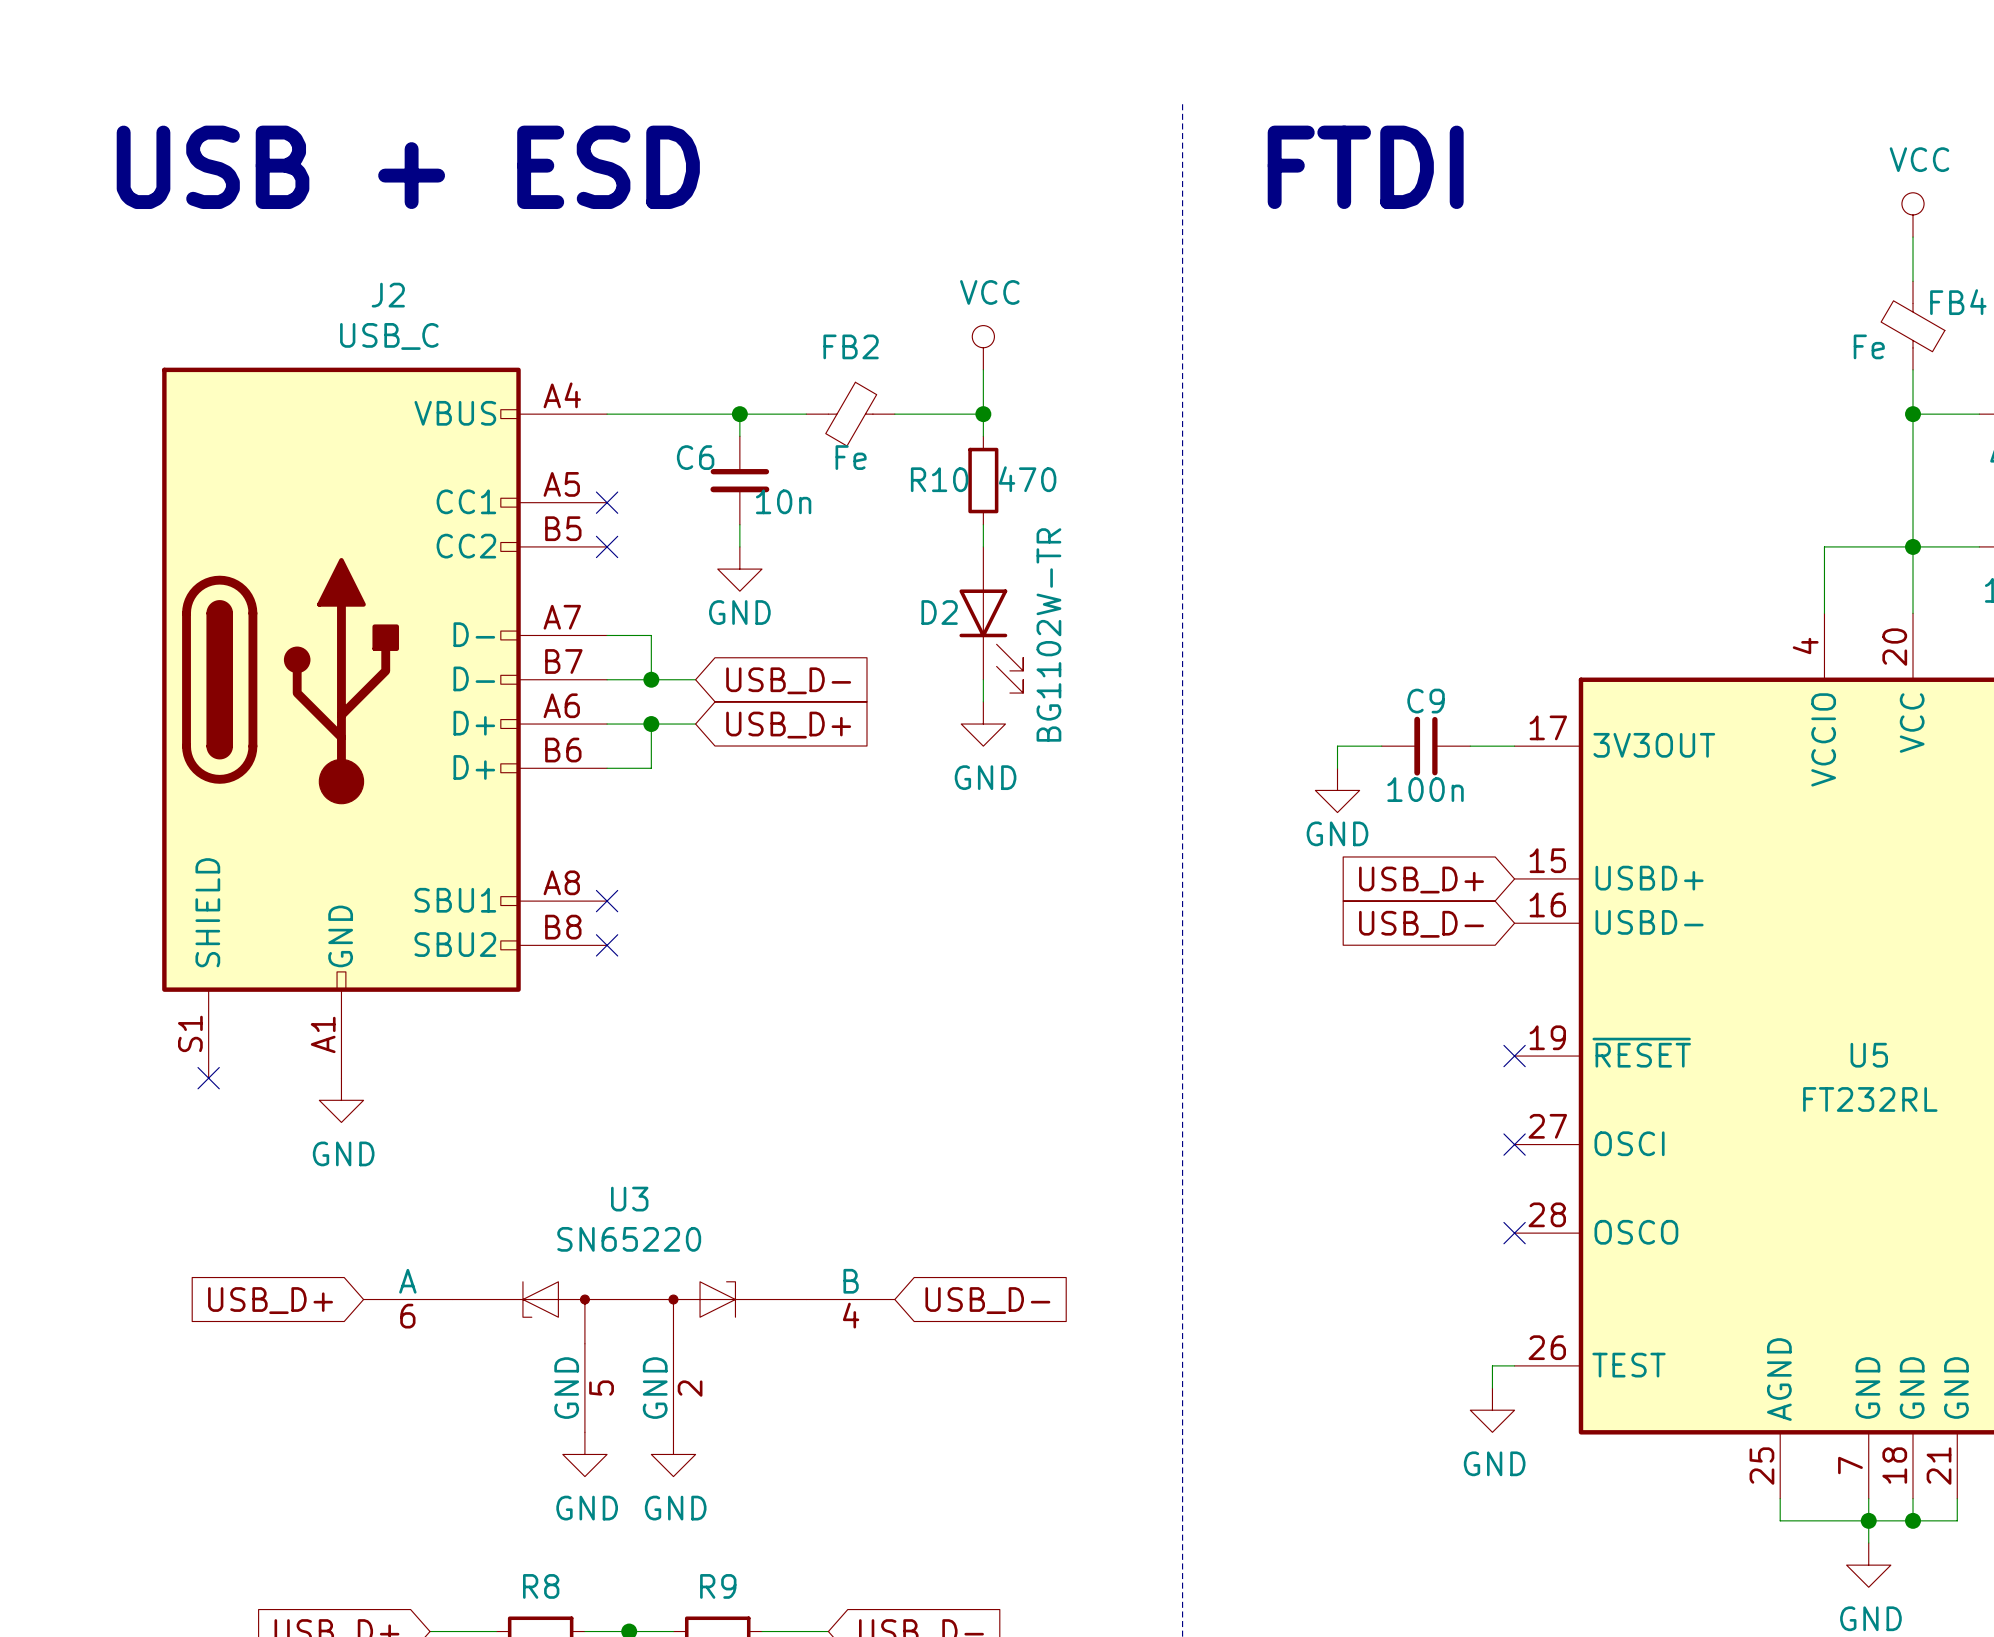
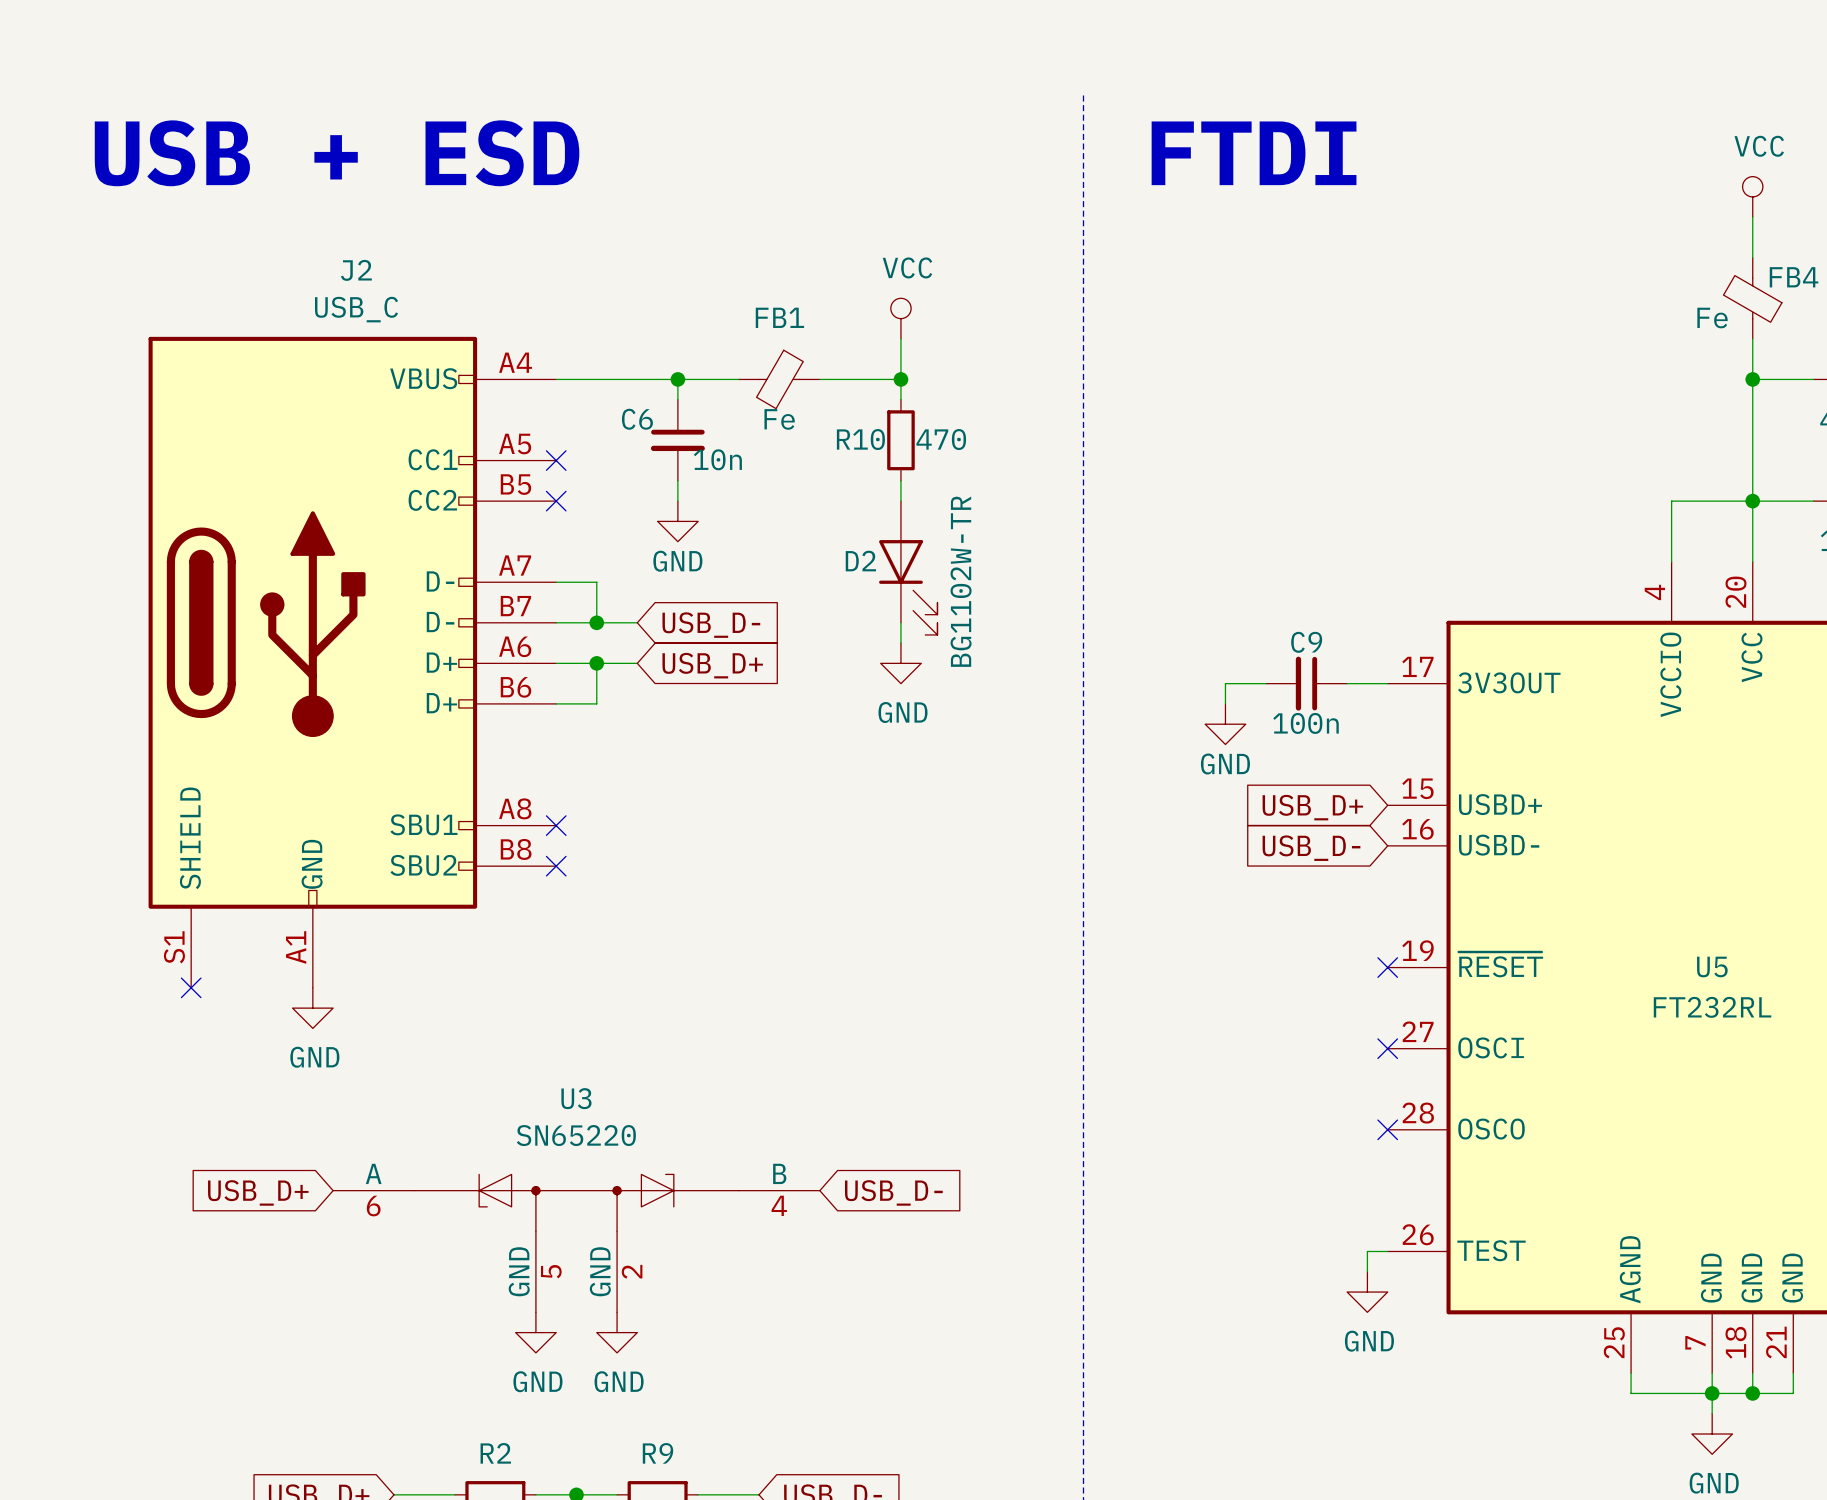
FB2 name: FB2 (851, 346) -> FB1 (779, 317)
R8 name: R8 (541, 1586) -> R2 (495, 1453)

